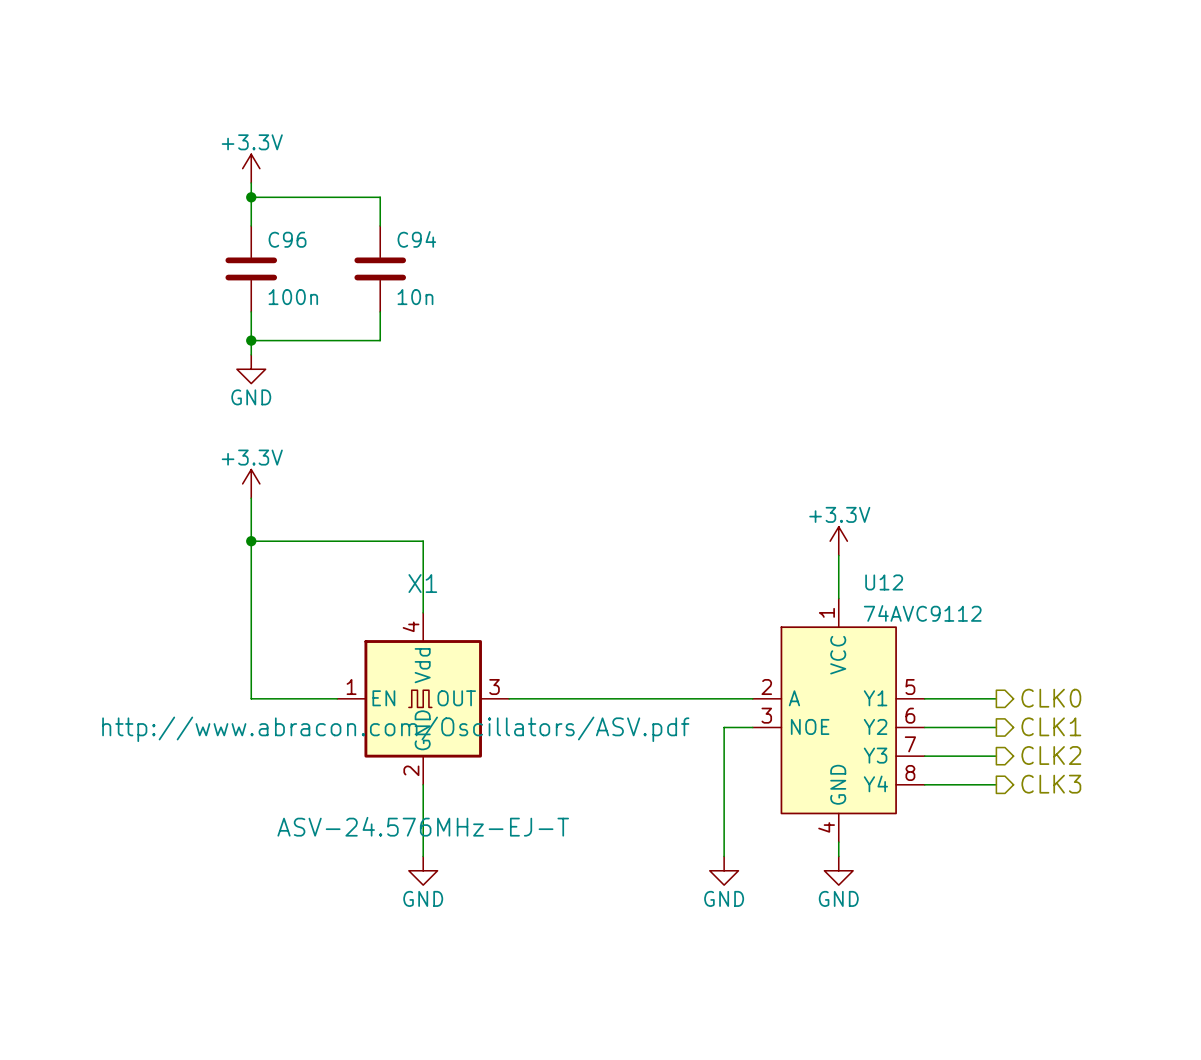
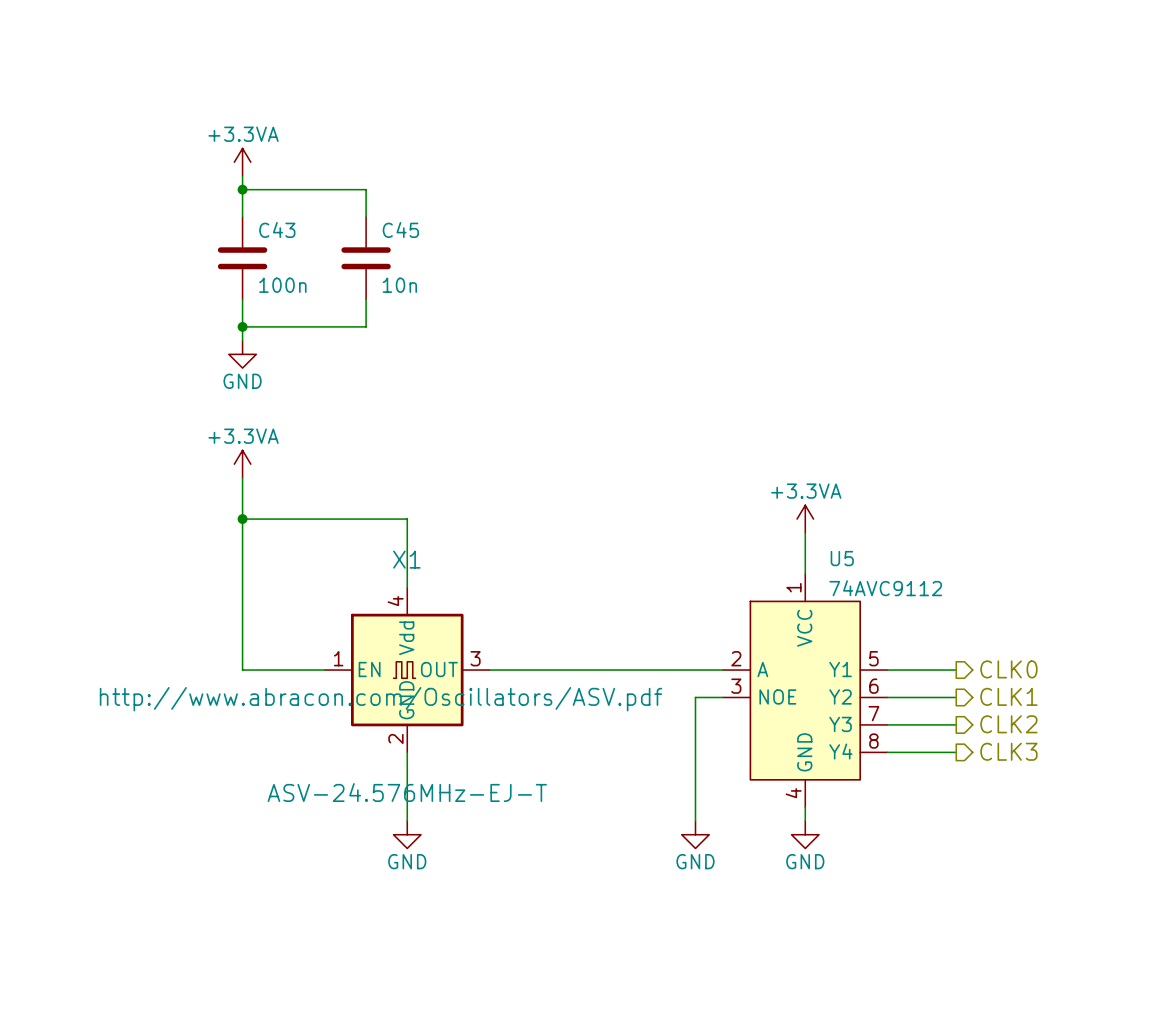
power symbol: +3.3V (251, 168) -> +3.3VA (242, 162)
C96 name: C96 (287, 239) -> C43 (277, 230)
C94 name: C94 (416, 239) -> C45 (400, 230)
power symbol: +3.3V (251, 483) -> +3.3VA (242, 464)
power symbol: +3.3V (838, 541) -> +3.3VA (805, 519)
U12 name: U12 (884, 582) -> U5 (842, 558)

